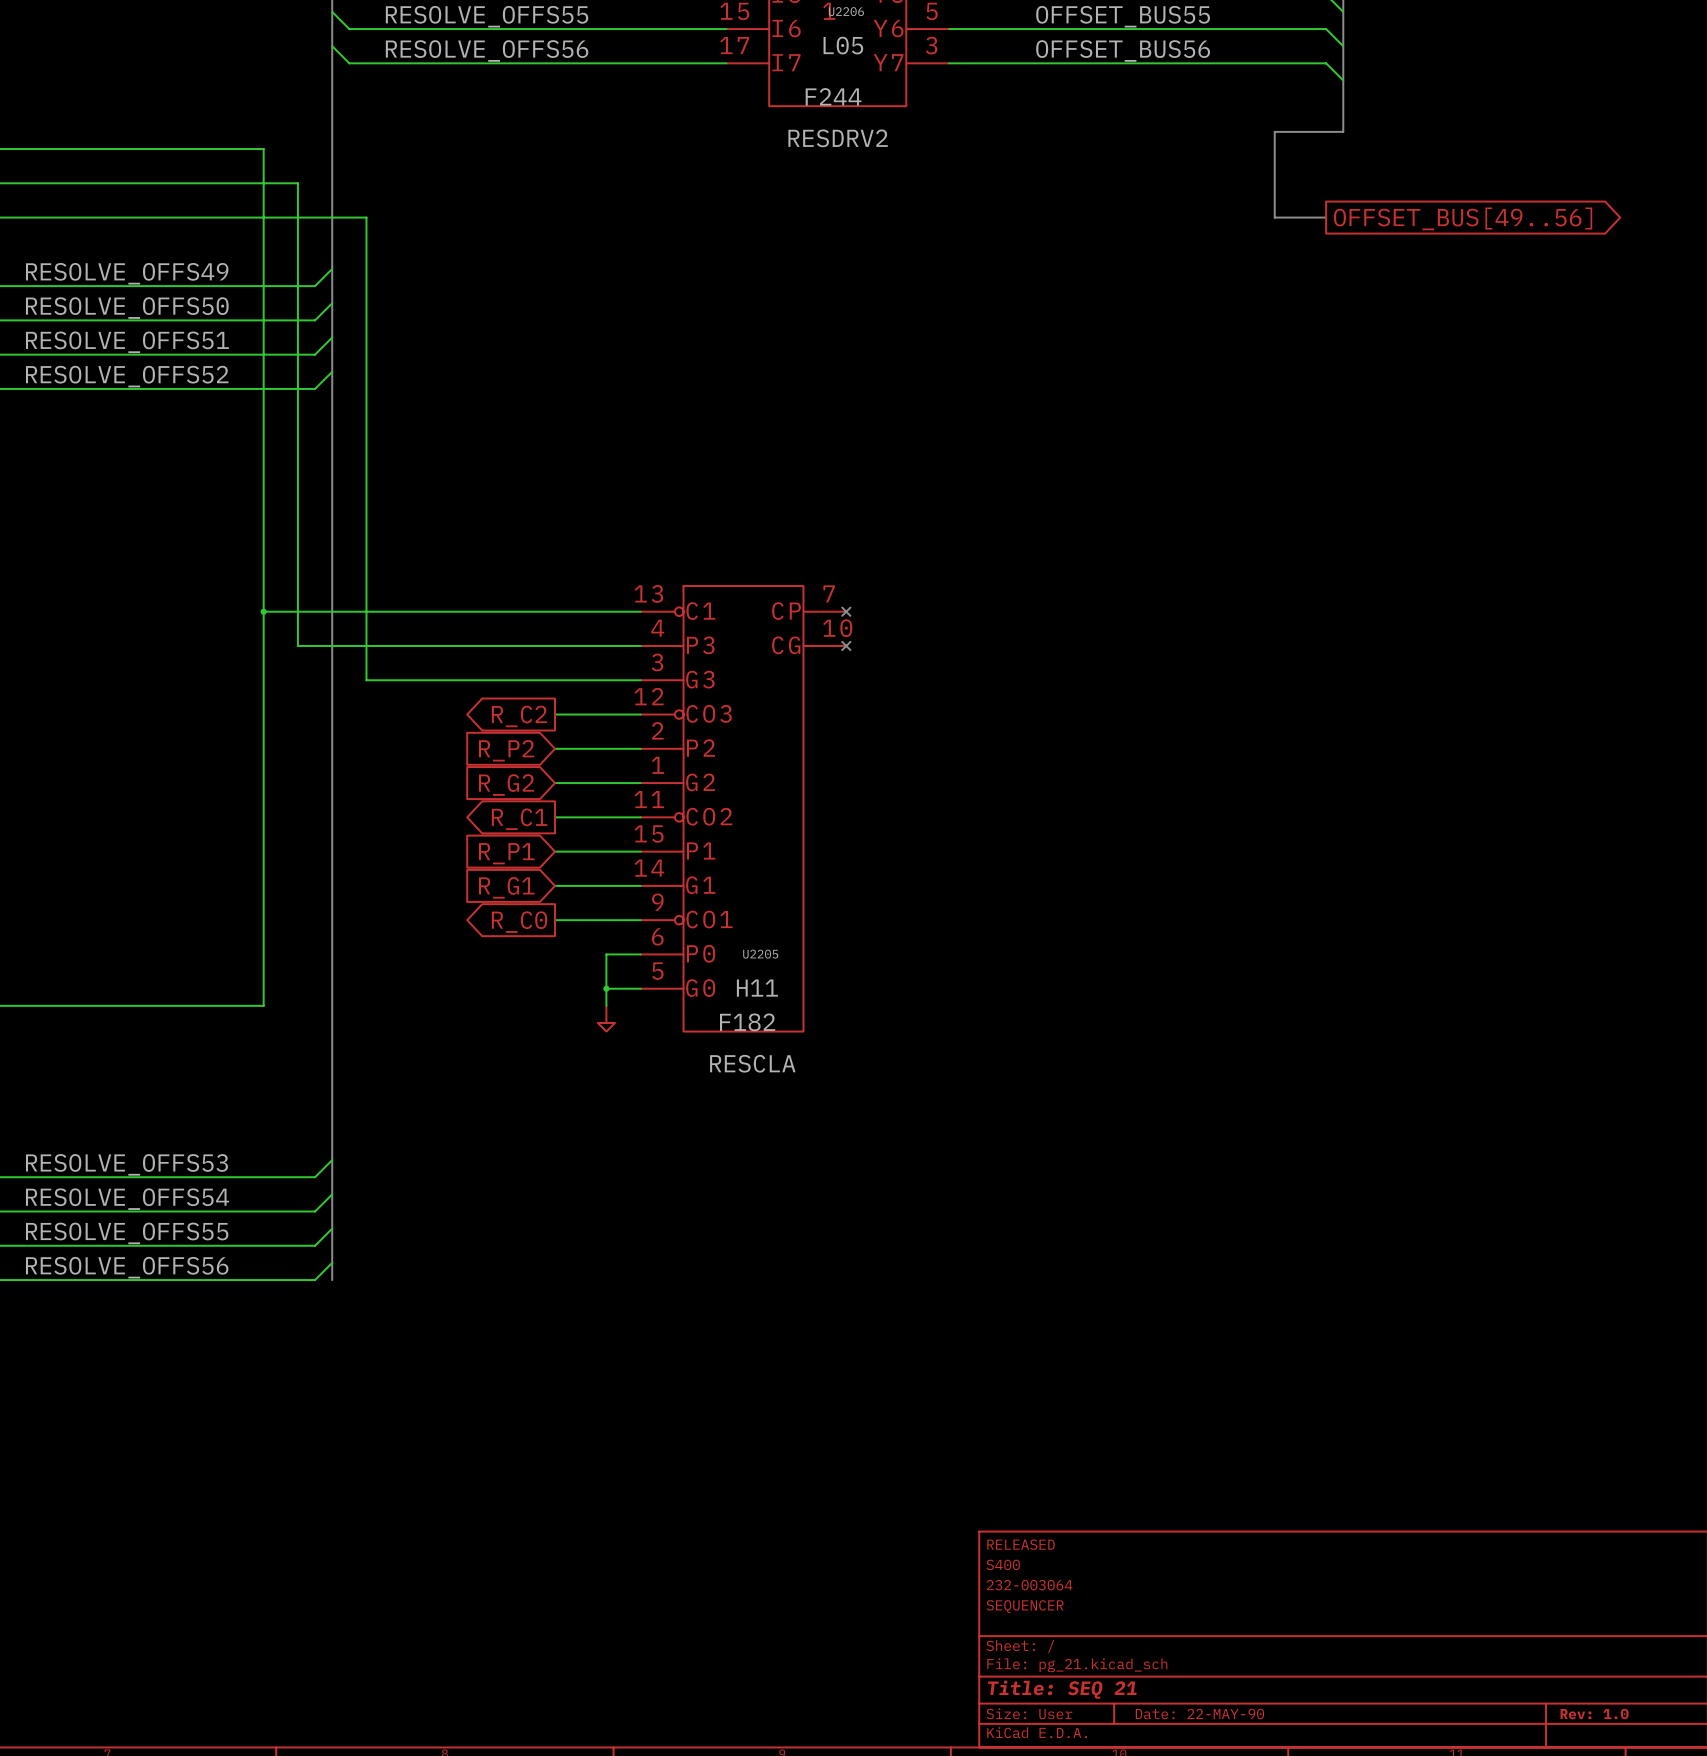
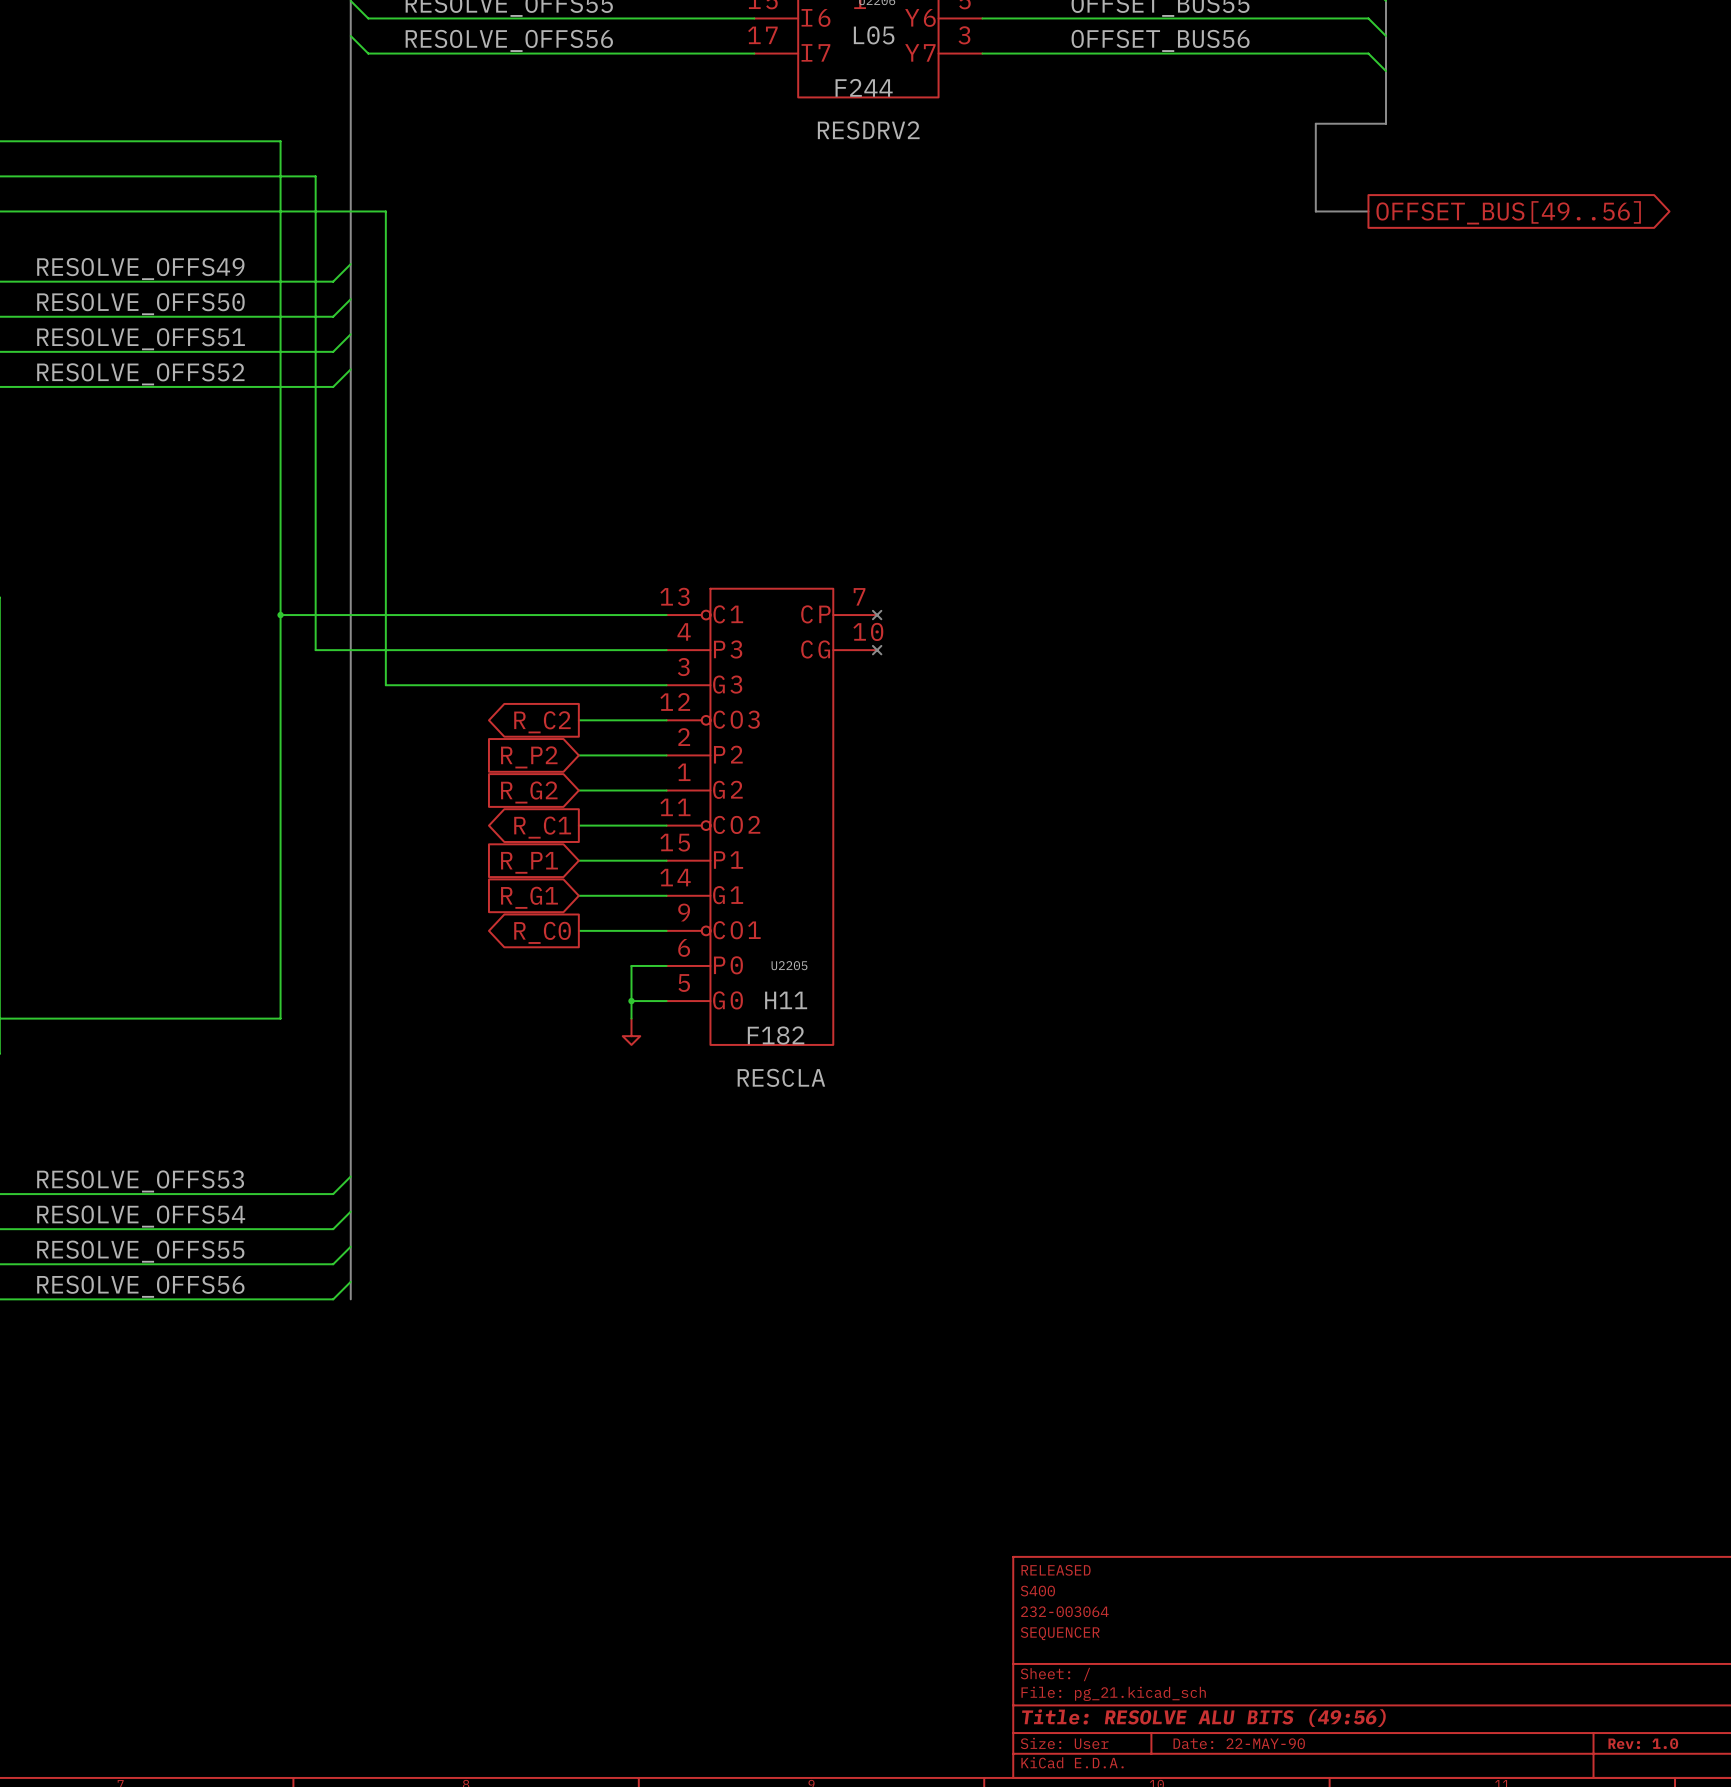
title block: Title: SEQ 21 (1062, 1689) -> Title: RESOLVE ALU BITS (49:56) (1203, 1718)

